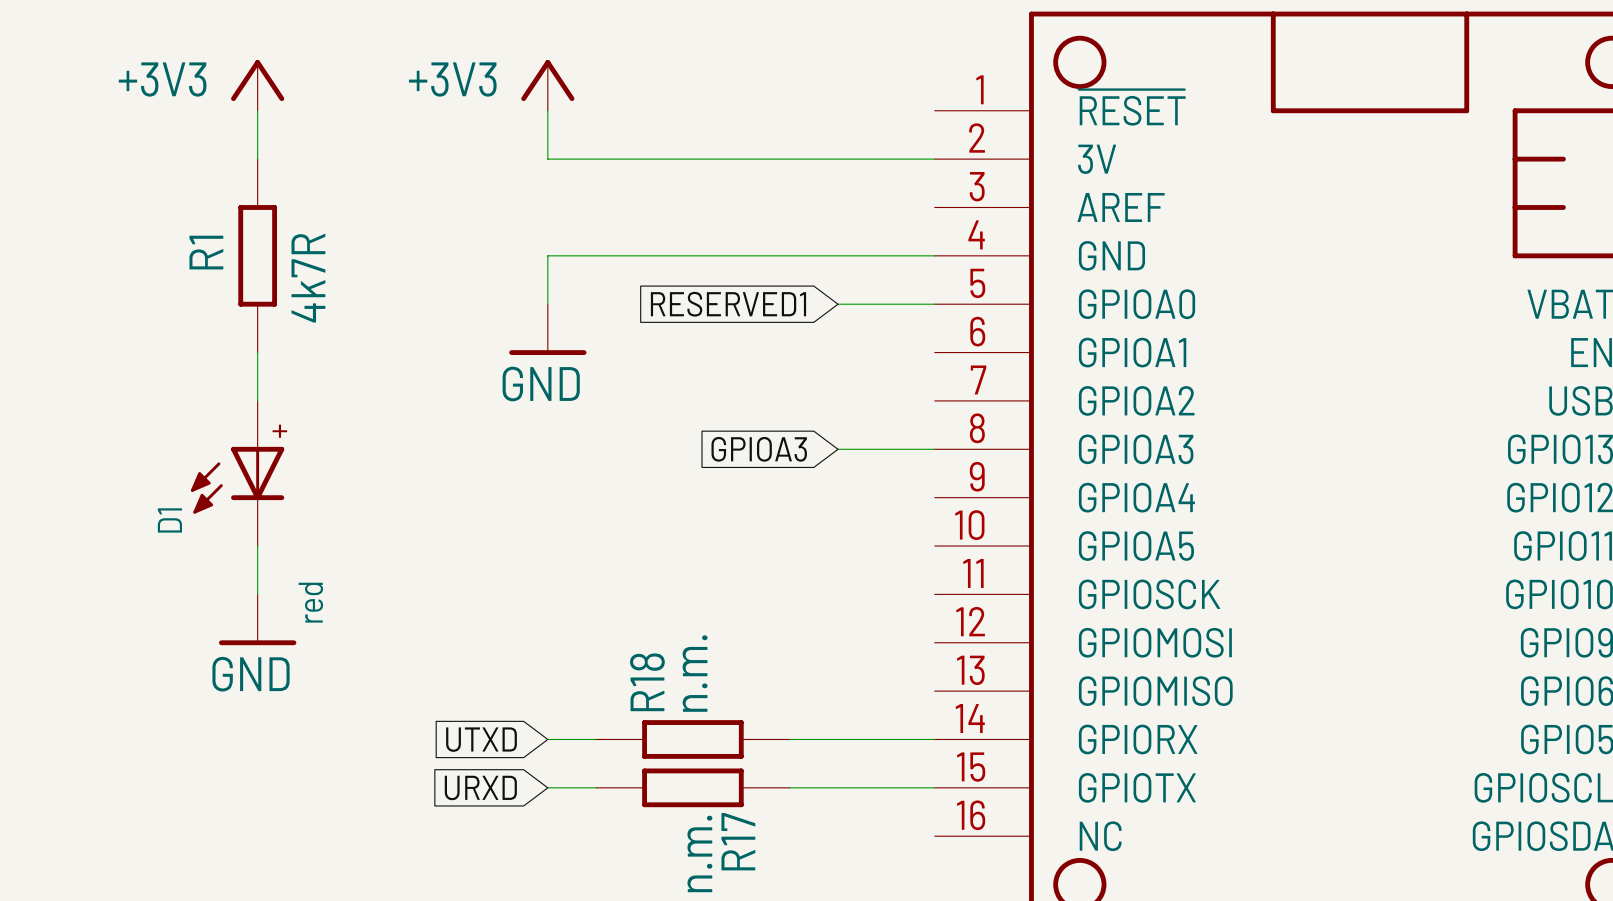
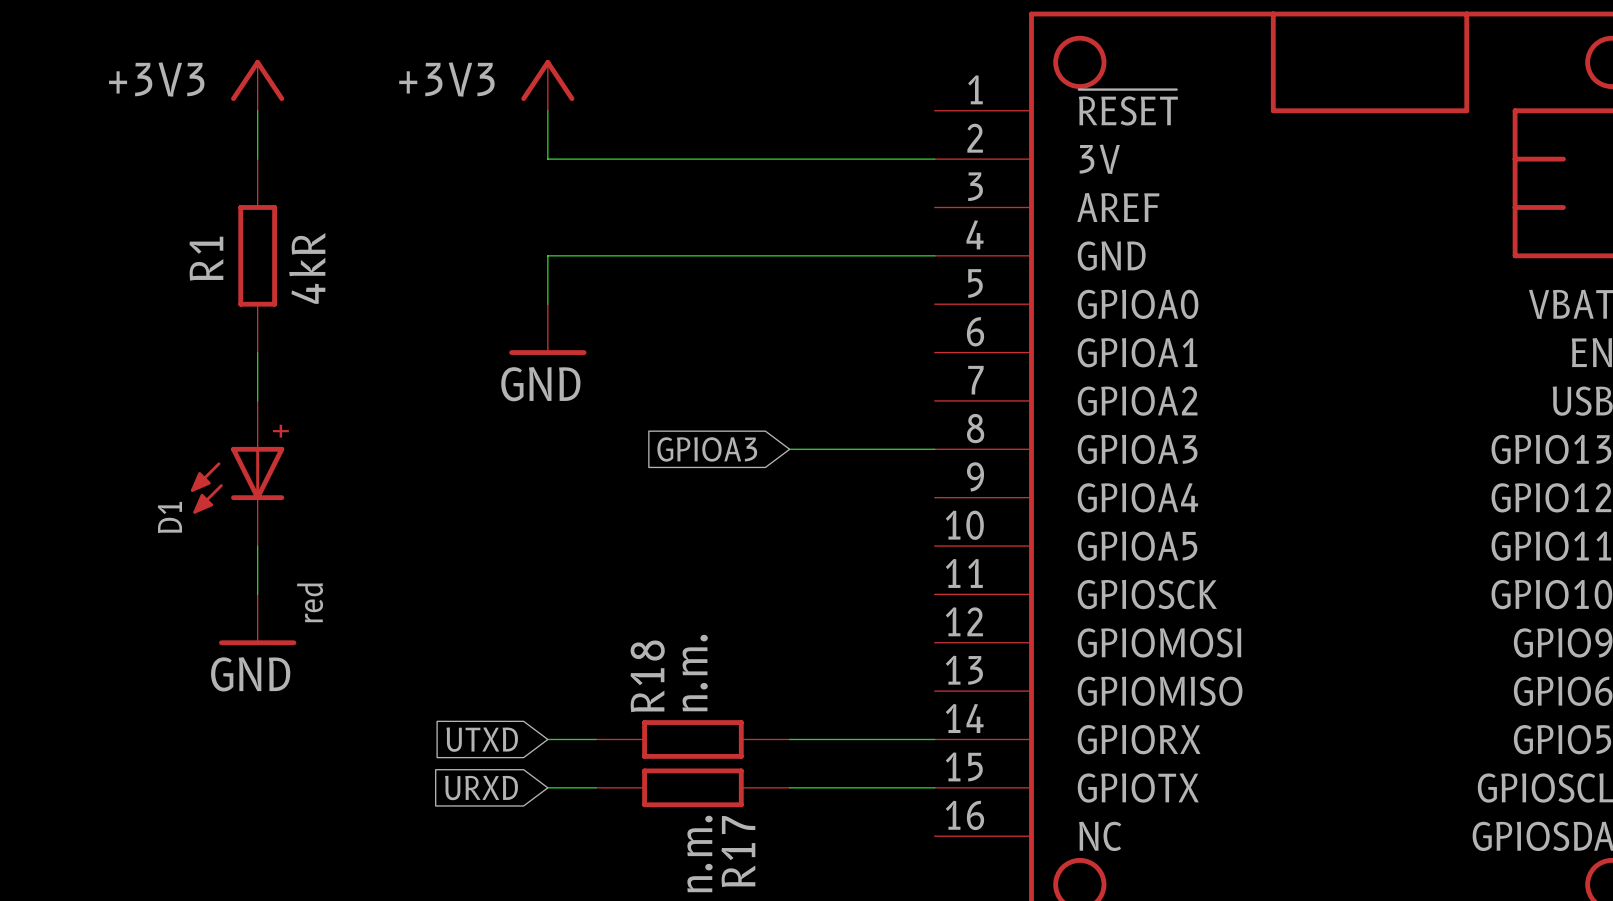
R1 value: 4k7R (308, 278) -> 4kR (307, 268)
global label: RESERVED1 (728, 304) -> none
wire: (838, 304) (934, 304) -> none
global label position: GPIOA3 (759, 449) -> GPIOA3 (707, 449)
wire: none -> (789, 449) (838, 449)

